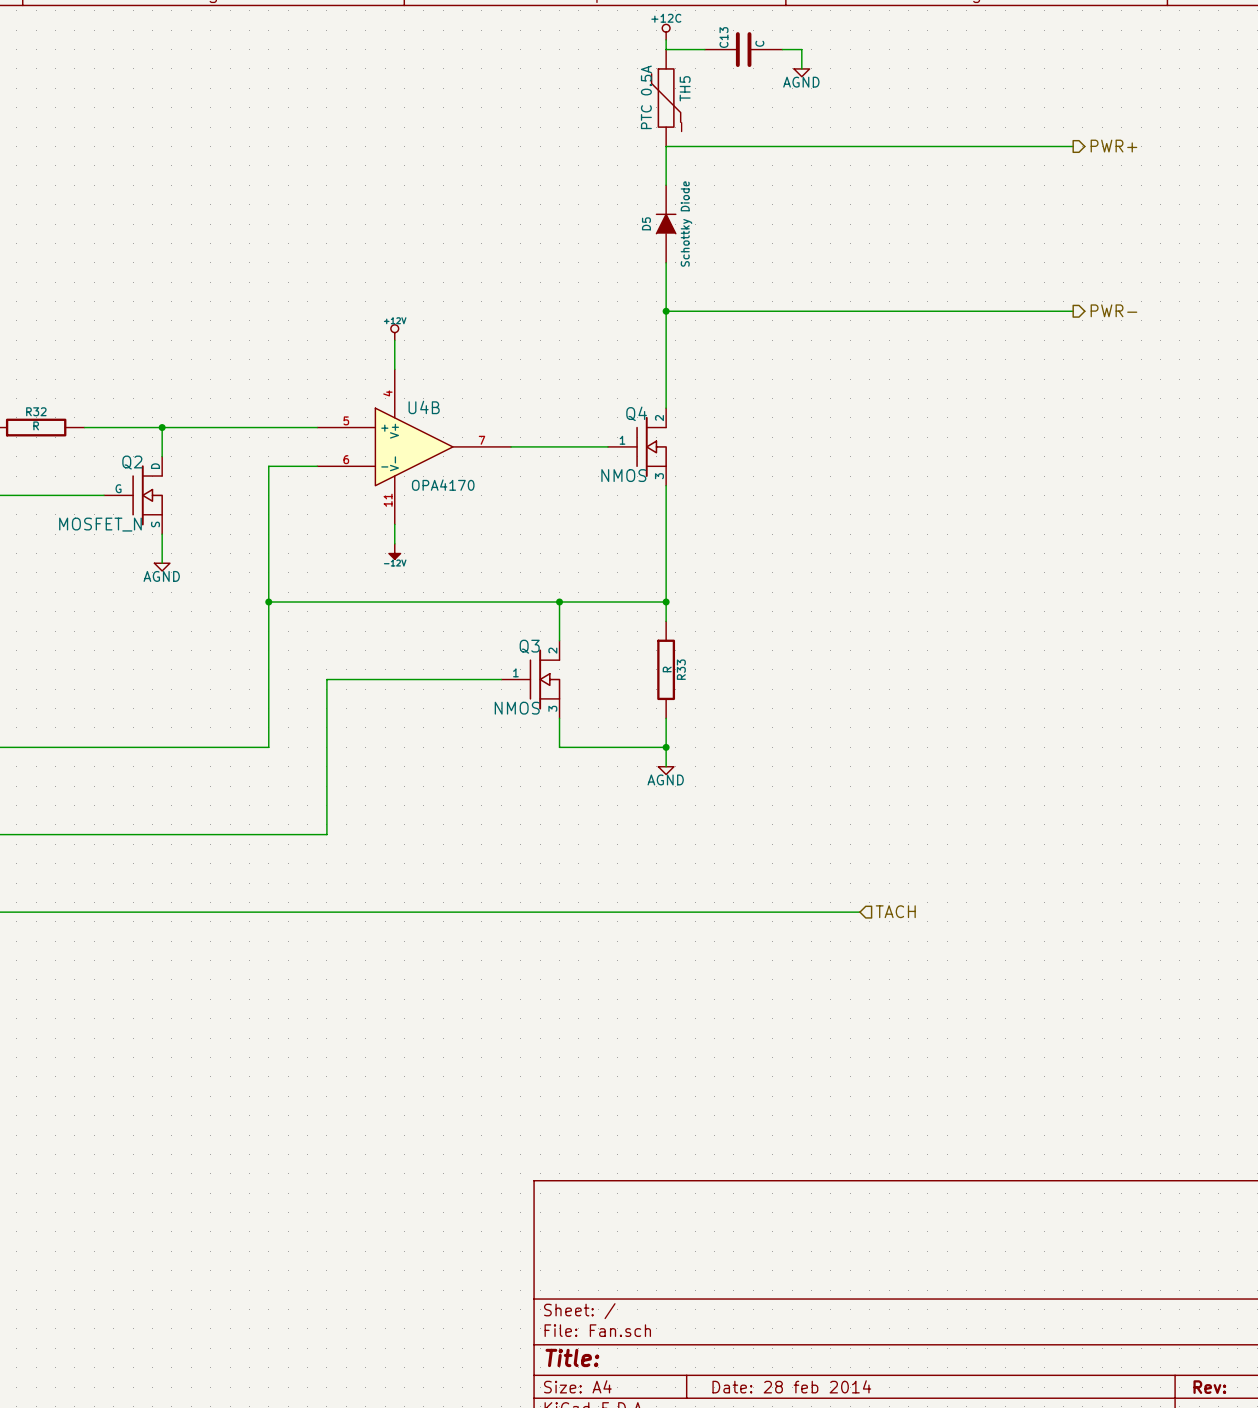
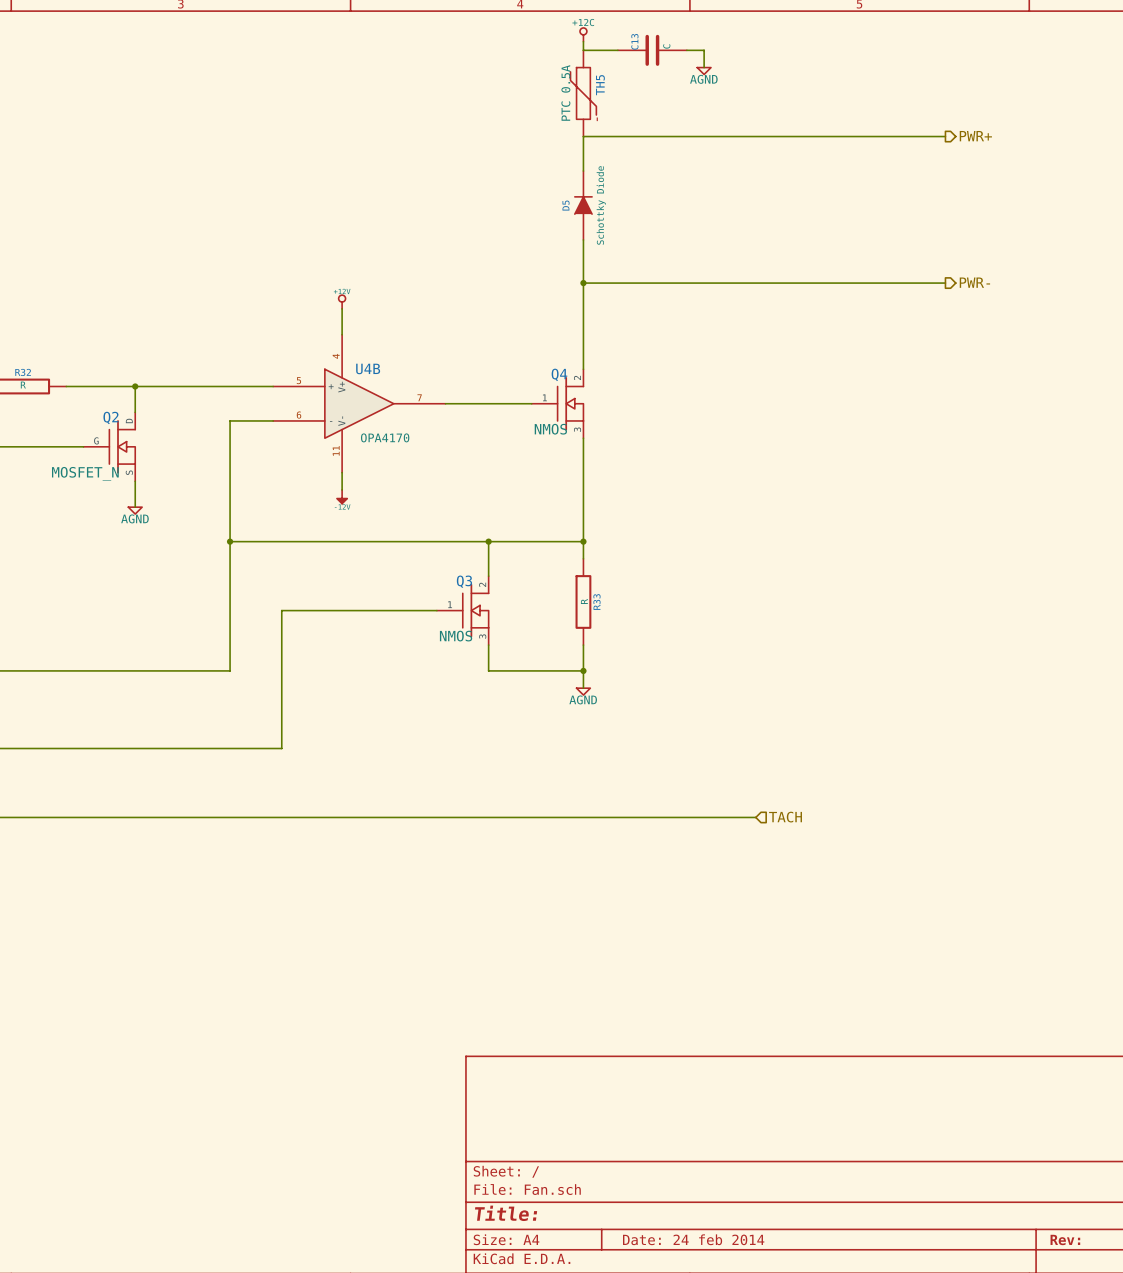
title block: Date: 28 feb 2014 (791, 1386) -> Date: 24 feb 2014 (693, 1239)

